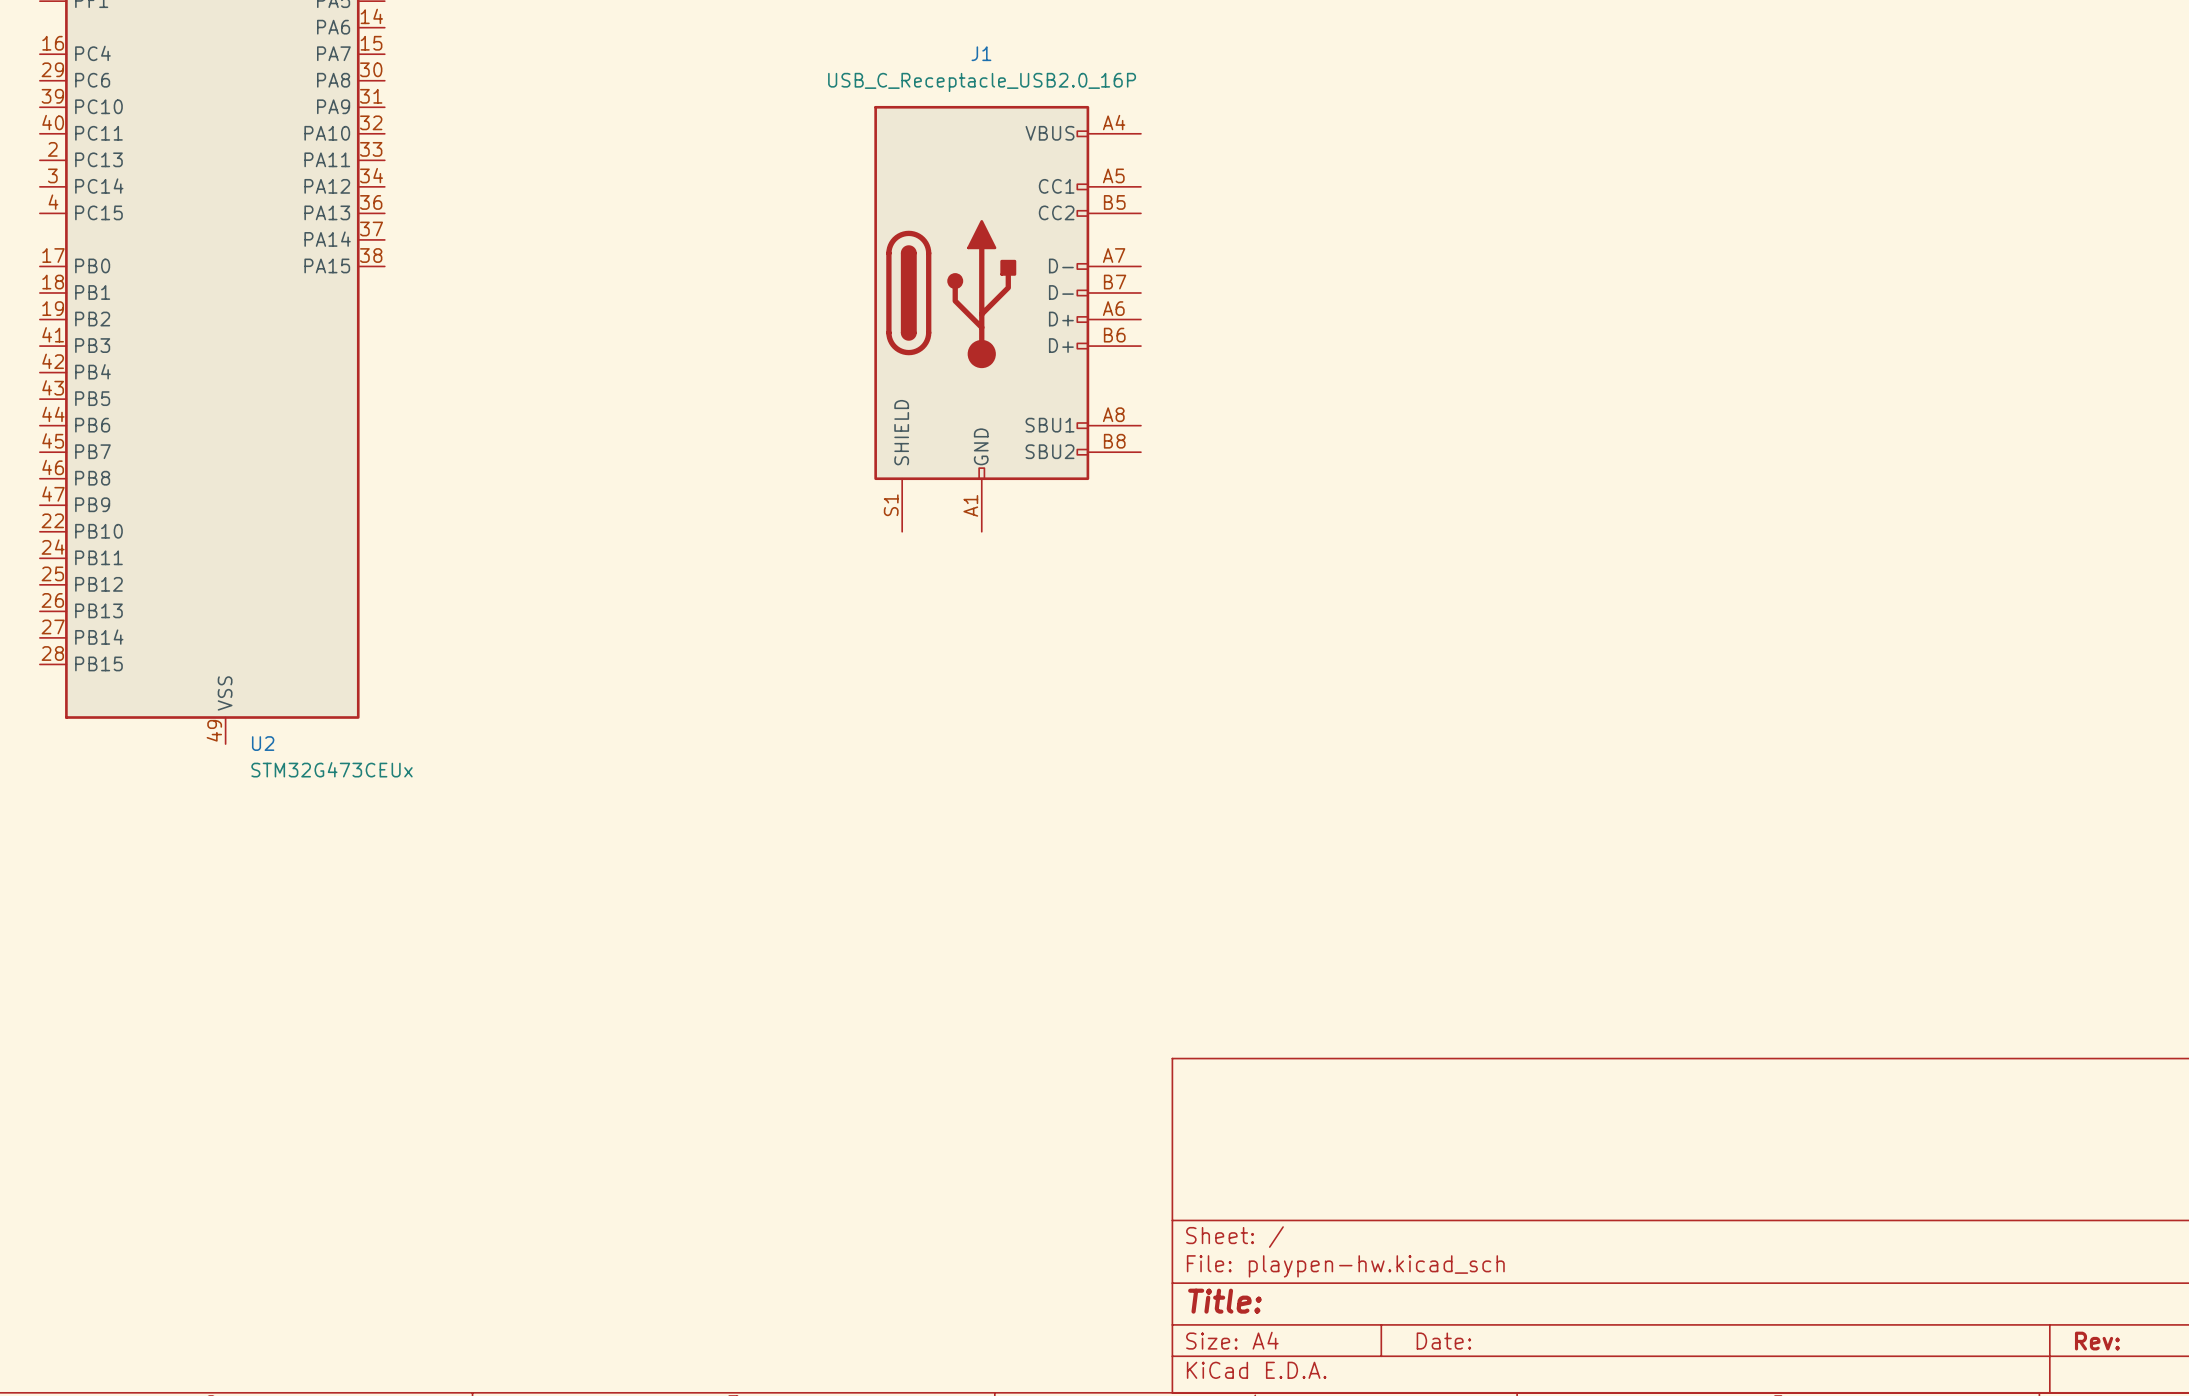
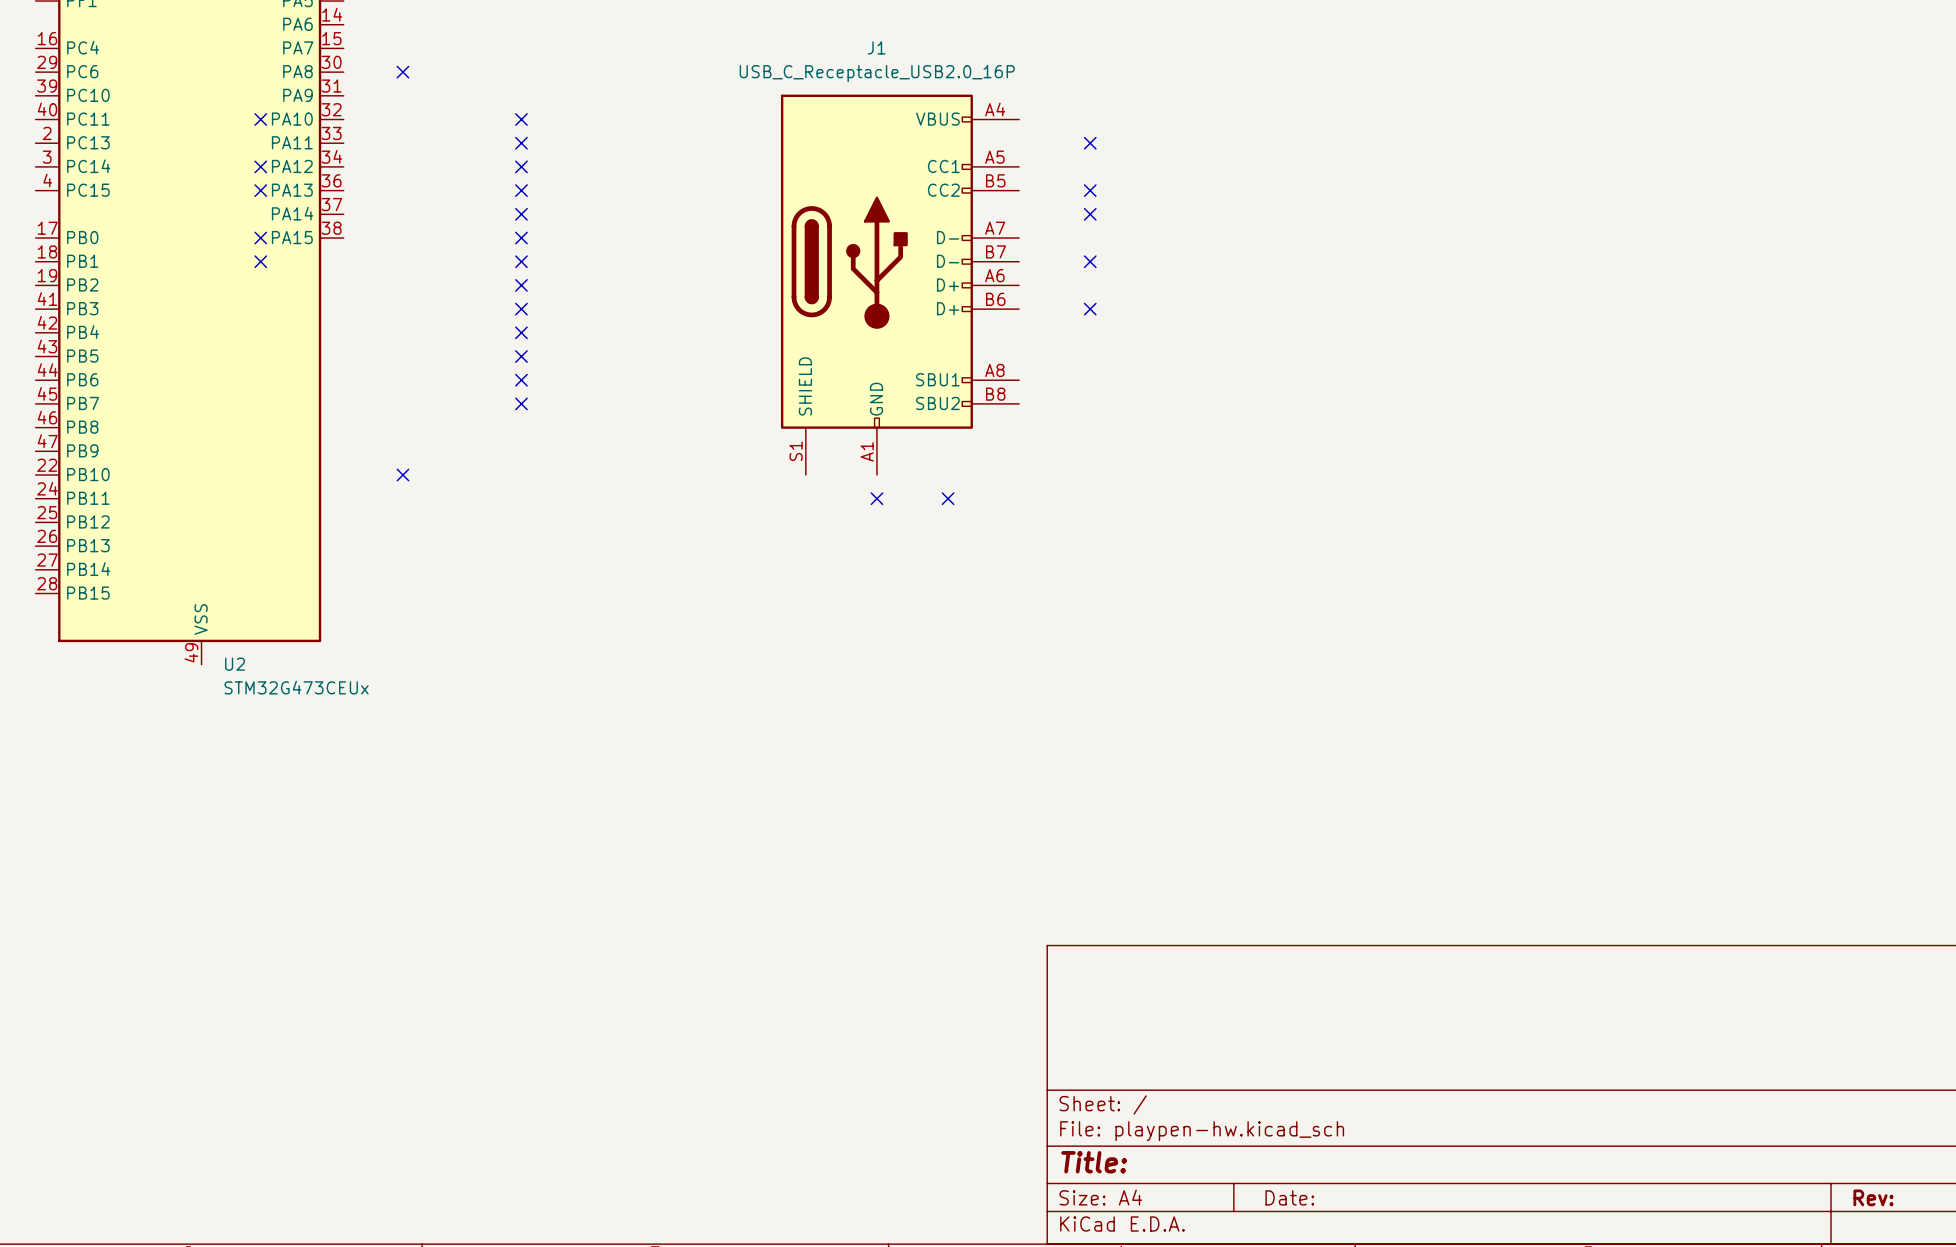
no-connect mark: none -> (402, 72)
no-connect mark: none -> (260, 119)
no-connect mark: none -> (521, 119)
no-connect mark: none -> (521, 143)
no-connect mark: none -> (1090, 143)
no-connect mark: none -> (260, 166)
no-connect mark: none -> (521, 166)
no-connect mark: none -> (260, 190)
no-connect mark: none -> (521, 190)
no-connect mark: none -> (1090, 190)
no-connect mark: none -> (521, 214)
no-connect mark: none -> (1090, 214)
no-connect mark: none -> (260, 238)
no-connect mark: none -> (521, 238)
no-connect mark: none -> (260, 261)
no-connect mark: none -> (521, 261)
no-connect mark: none -> (1090, 261)
no-connect mark: none -> (521, 285)
no-connect mark: none -> (521, 309)
no-connect mark: none -> (1090, 309)
no-connect mark: none -> (521, 332)
no-connect mark: none -> (521, 356)
no-connect mark: none -> (521, 380)
no-connect mark: none -> (521, 403)
no-connect mark: none -> (402, 475)
no-connect mark: none -> (876, 498)
no-connect mark: none -> (948, 498)

